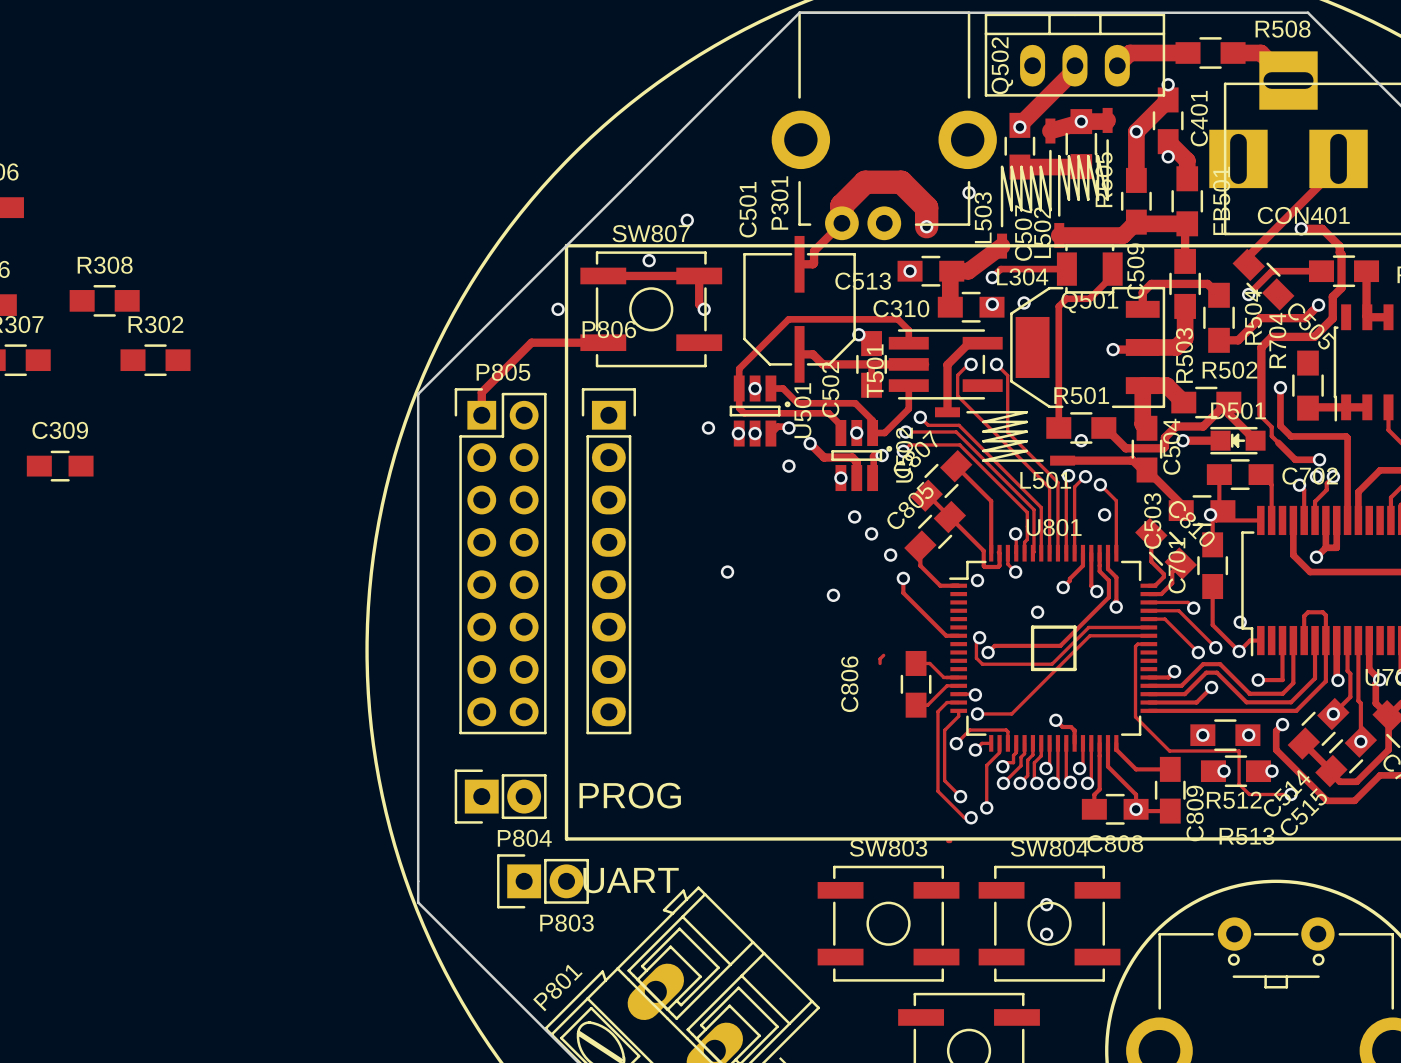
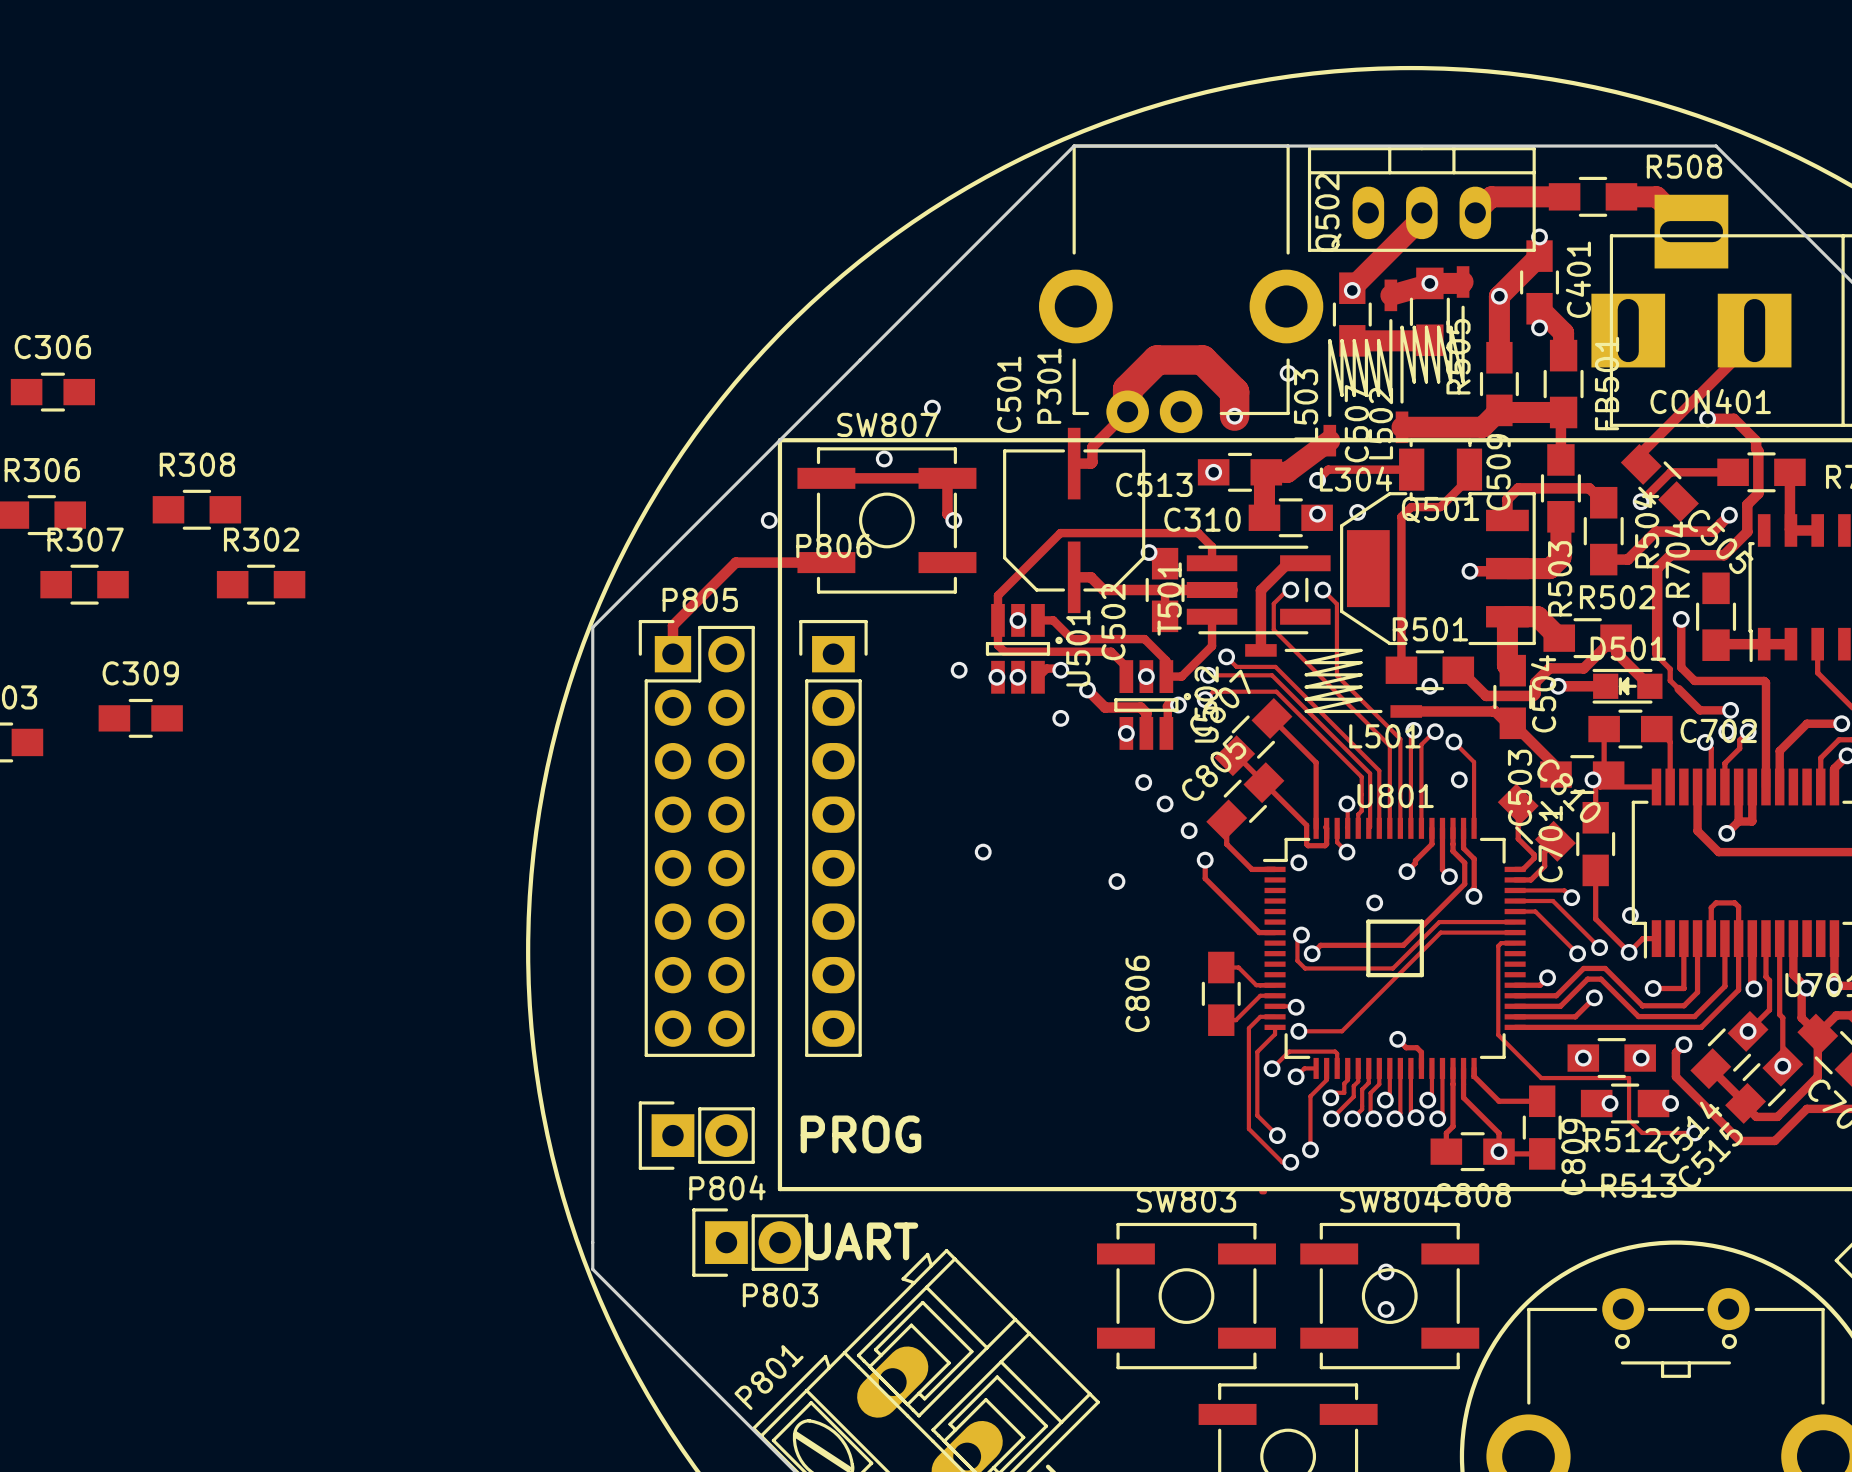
track: (883, 655) (880, 658) (880, 663) -> none

